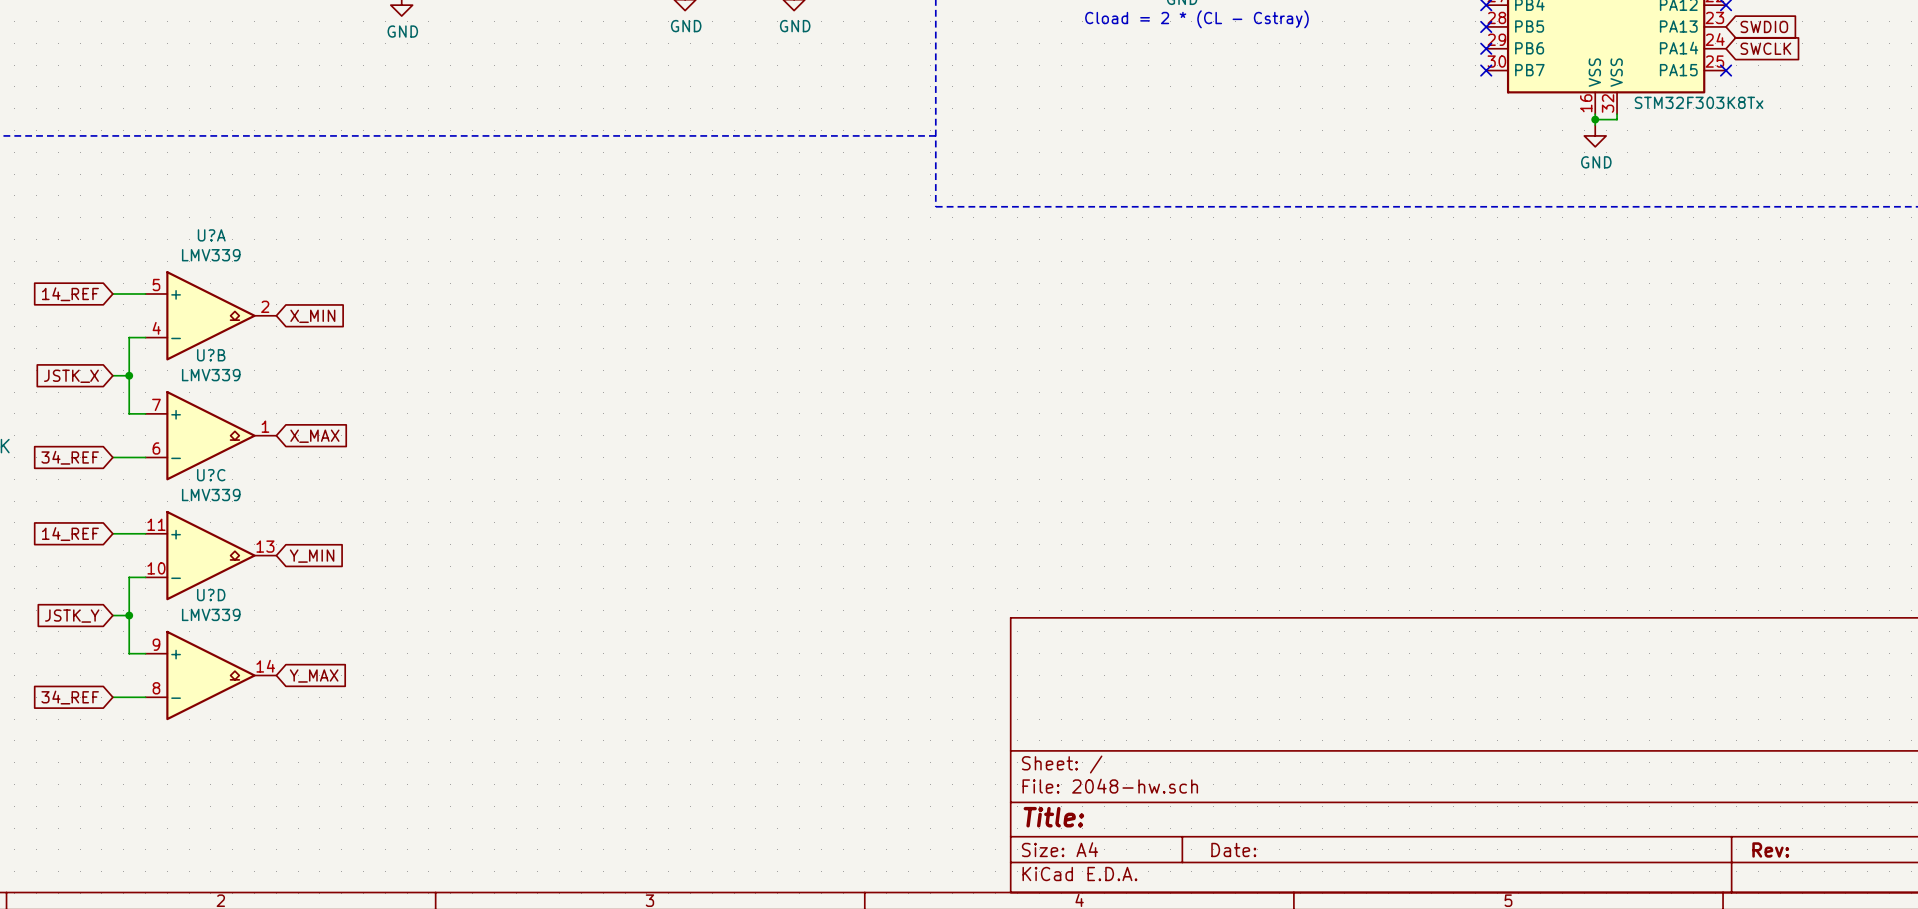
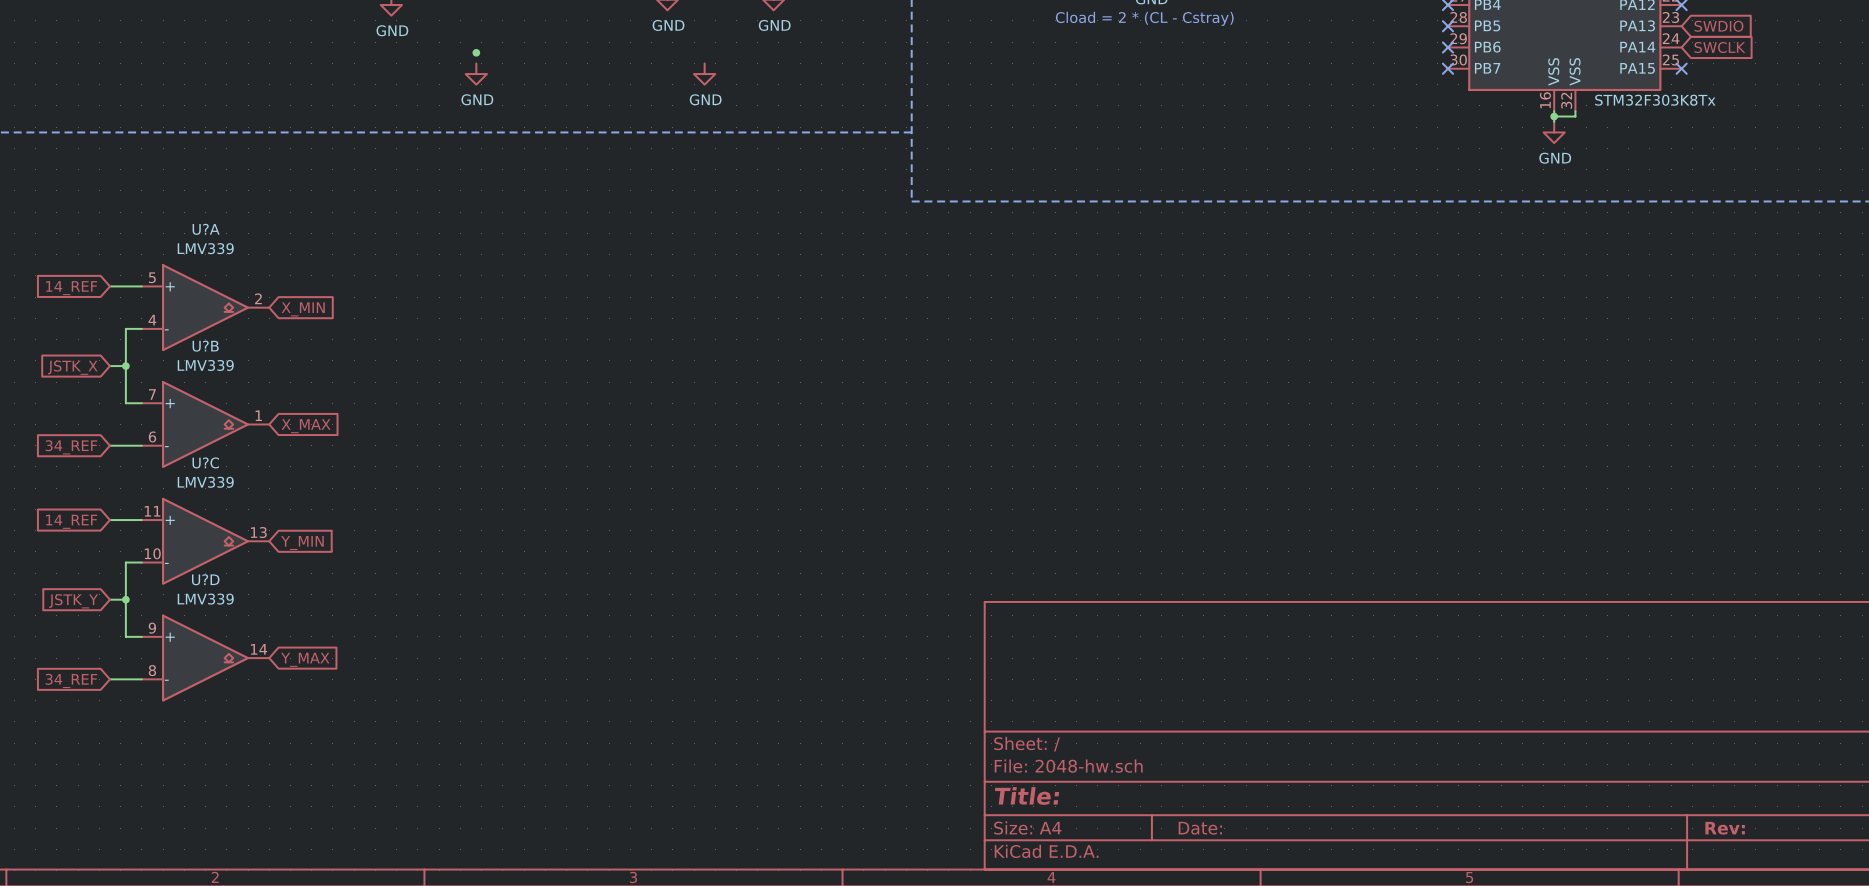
junction: none -> (476, 52)
power symbol: none -> GND (476, 74)
power symbol: none -> GND (704, 74)

